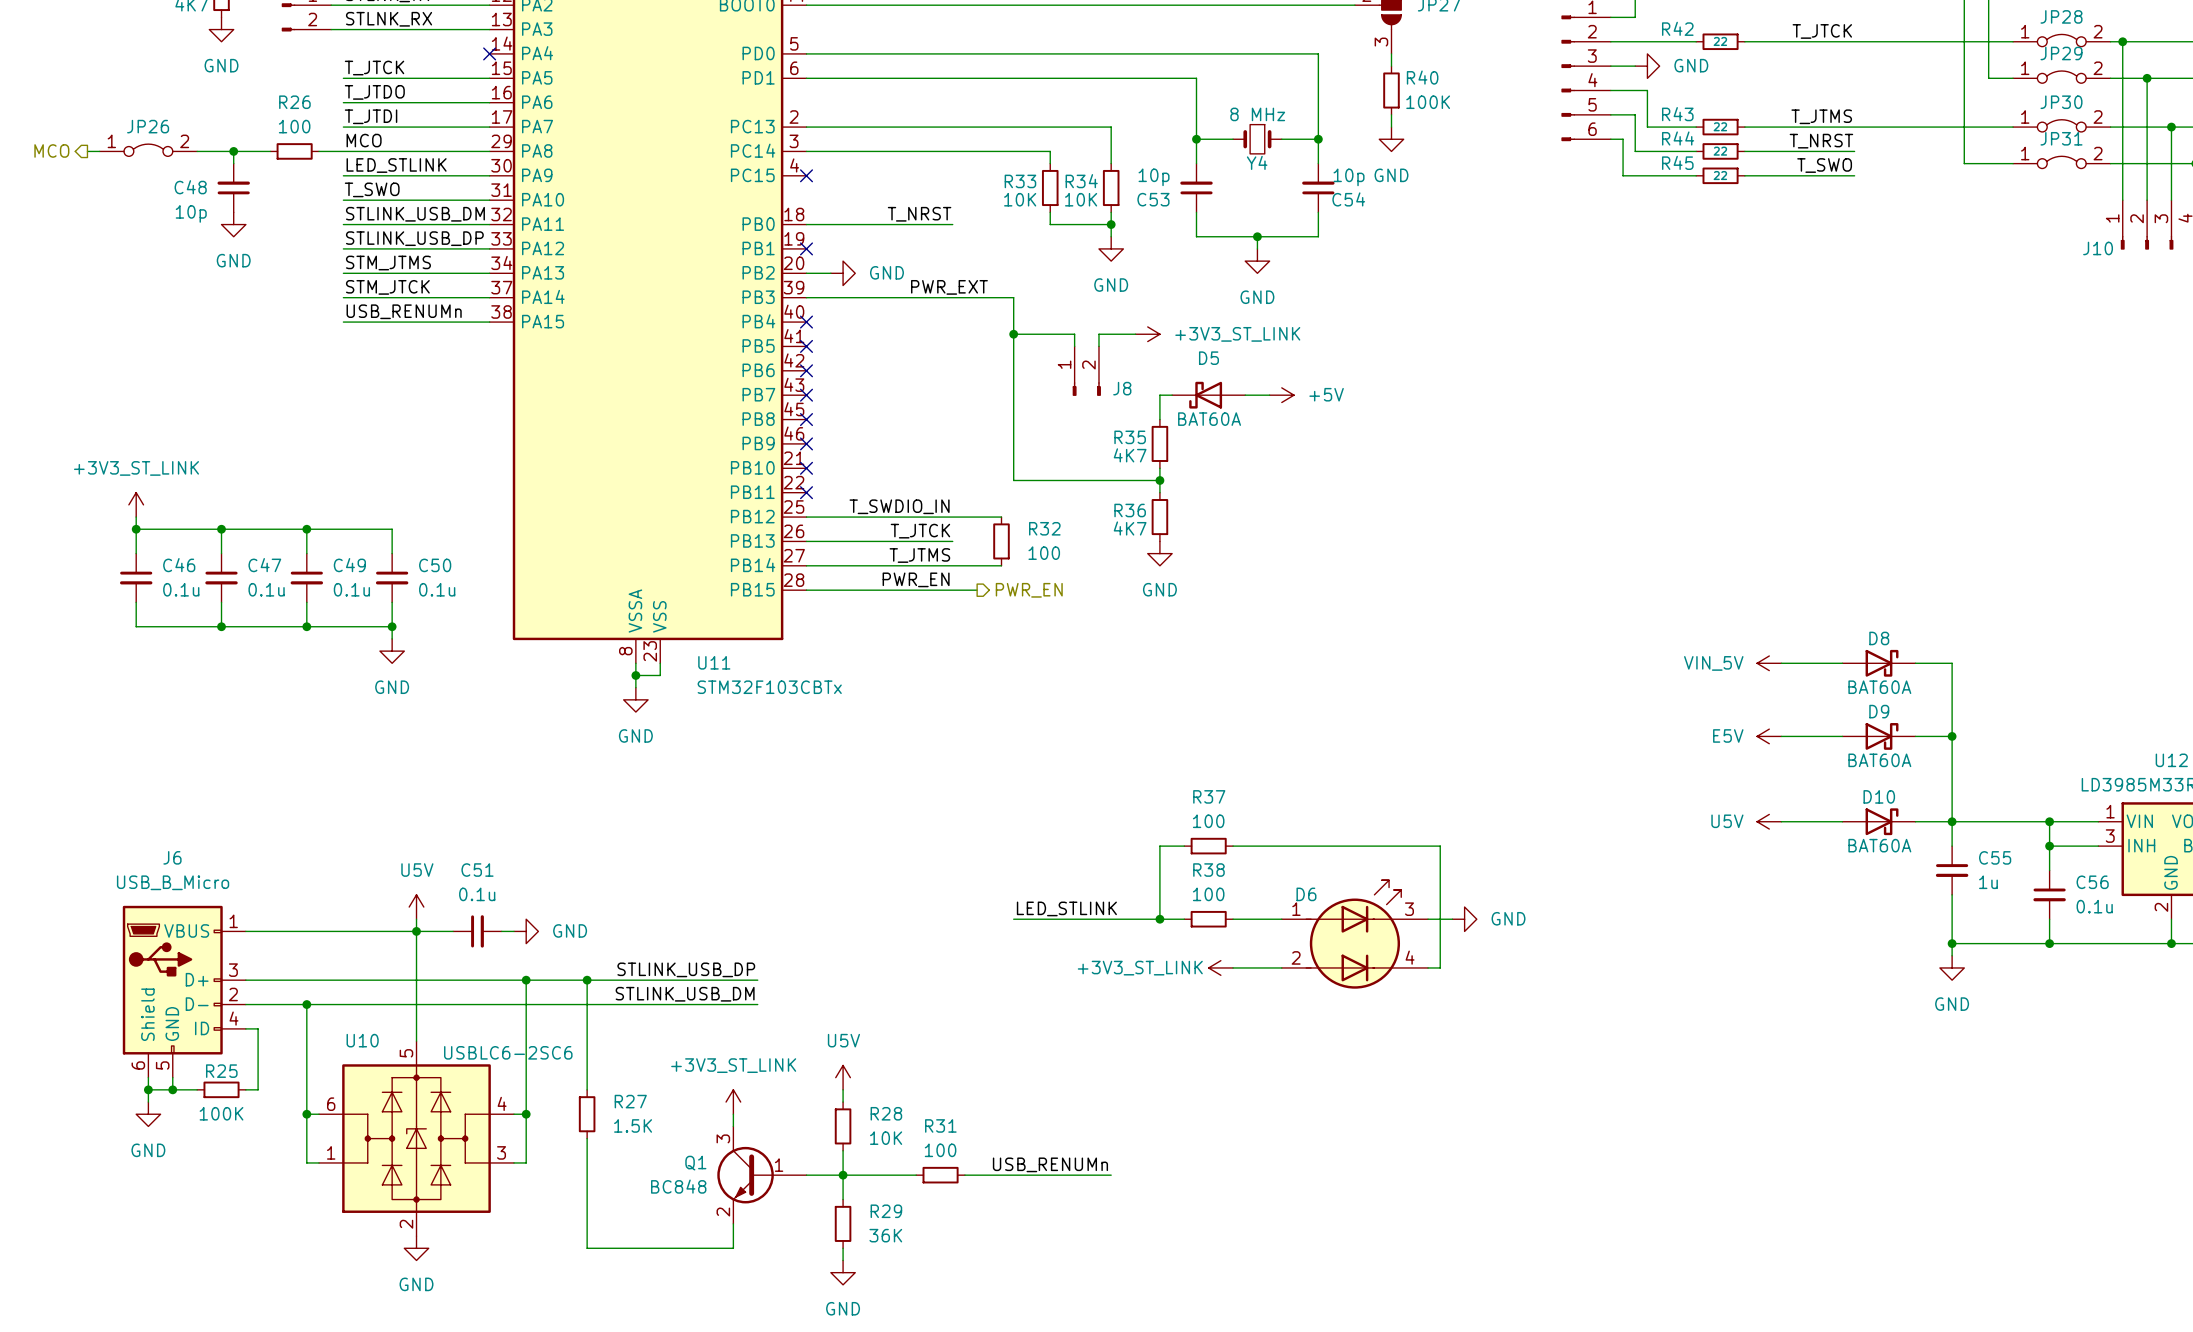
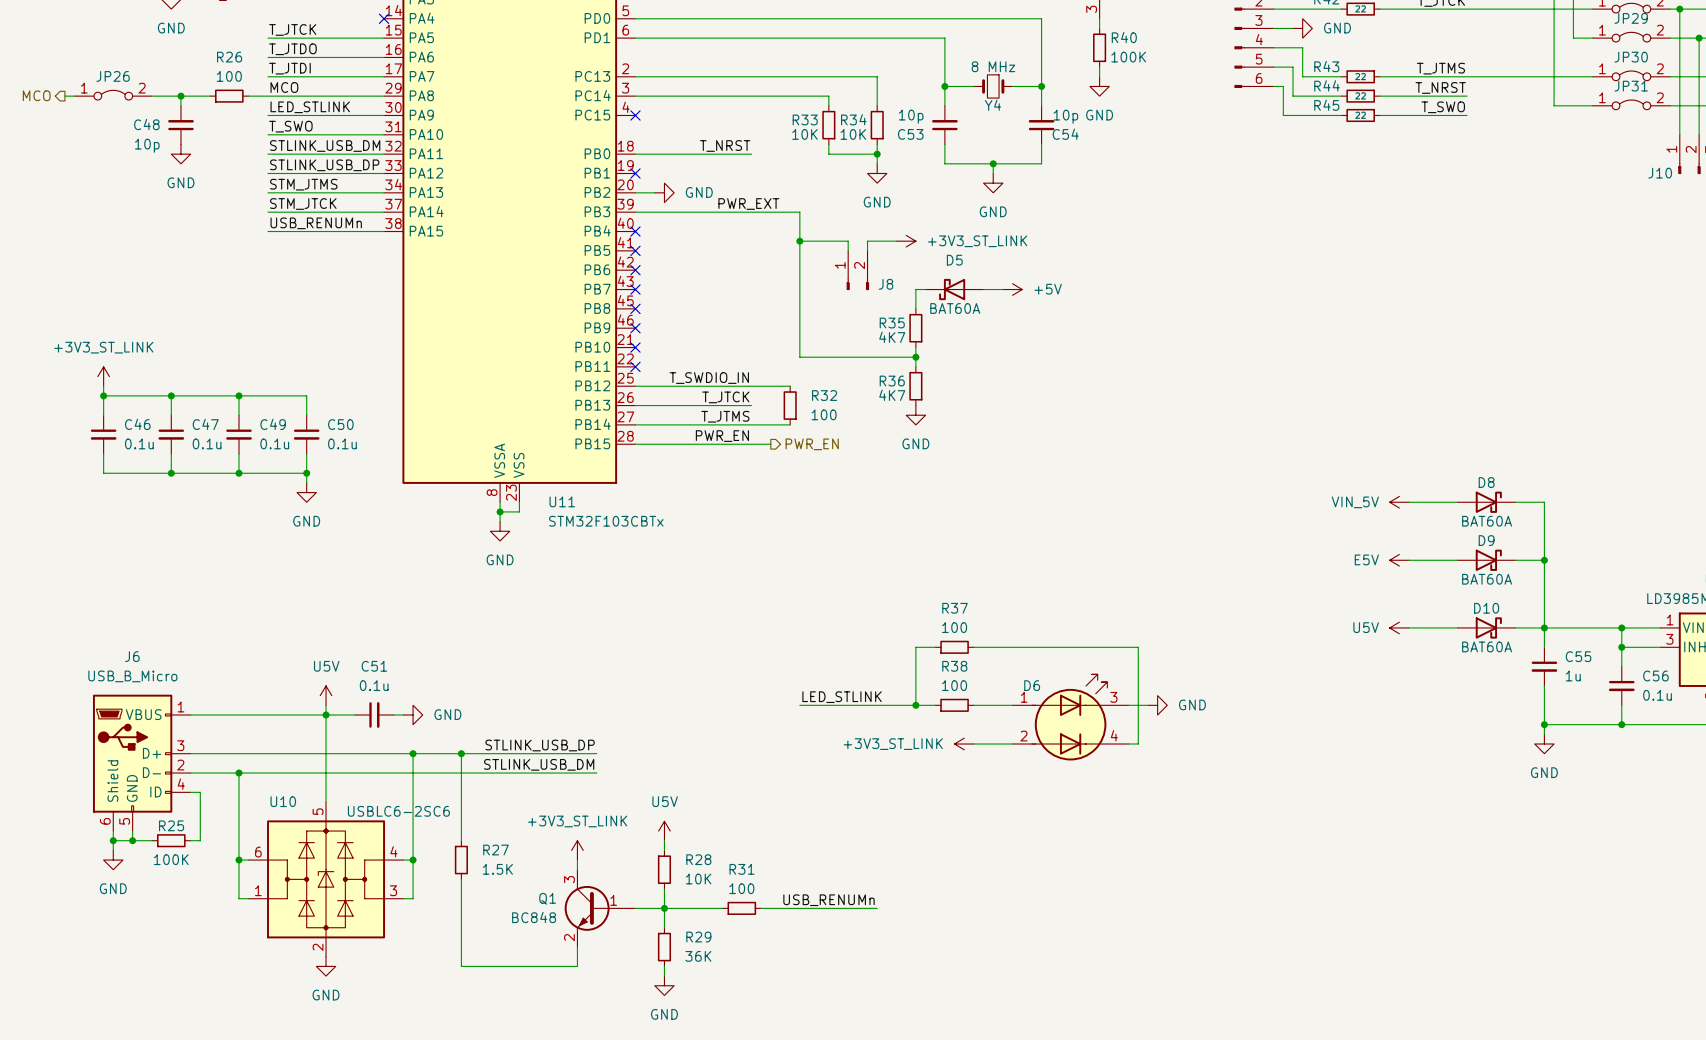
power symbol text position: +3V3_ST_LINK (1140, 968) -> +3V3_ST_LINK (893, 744)

